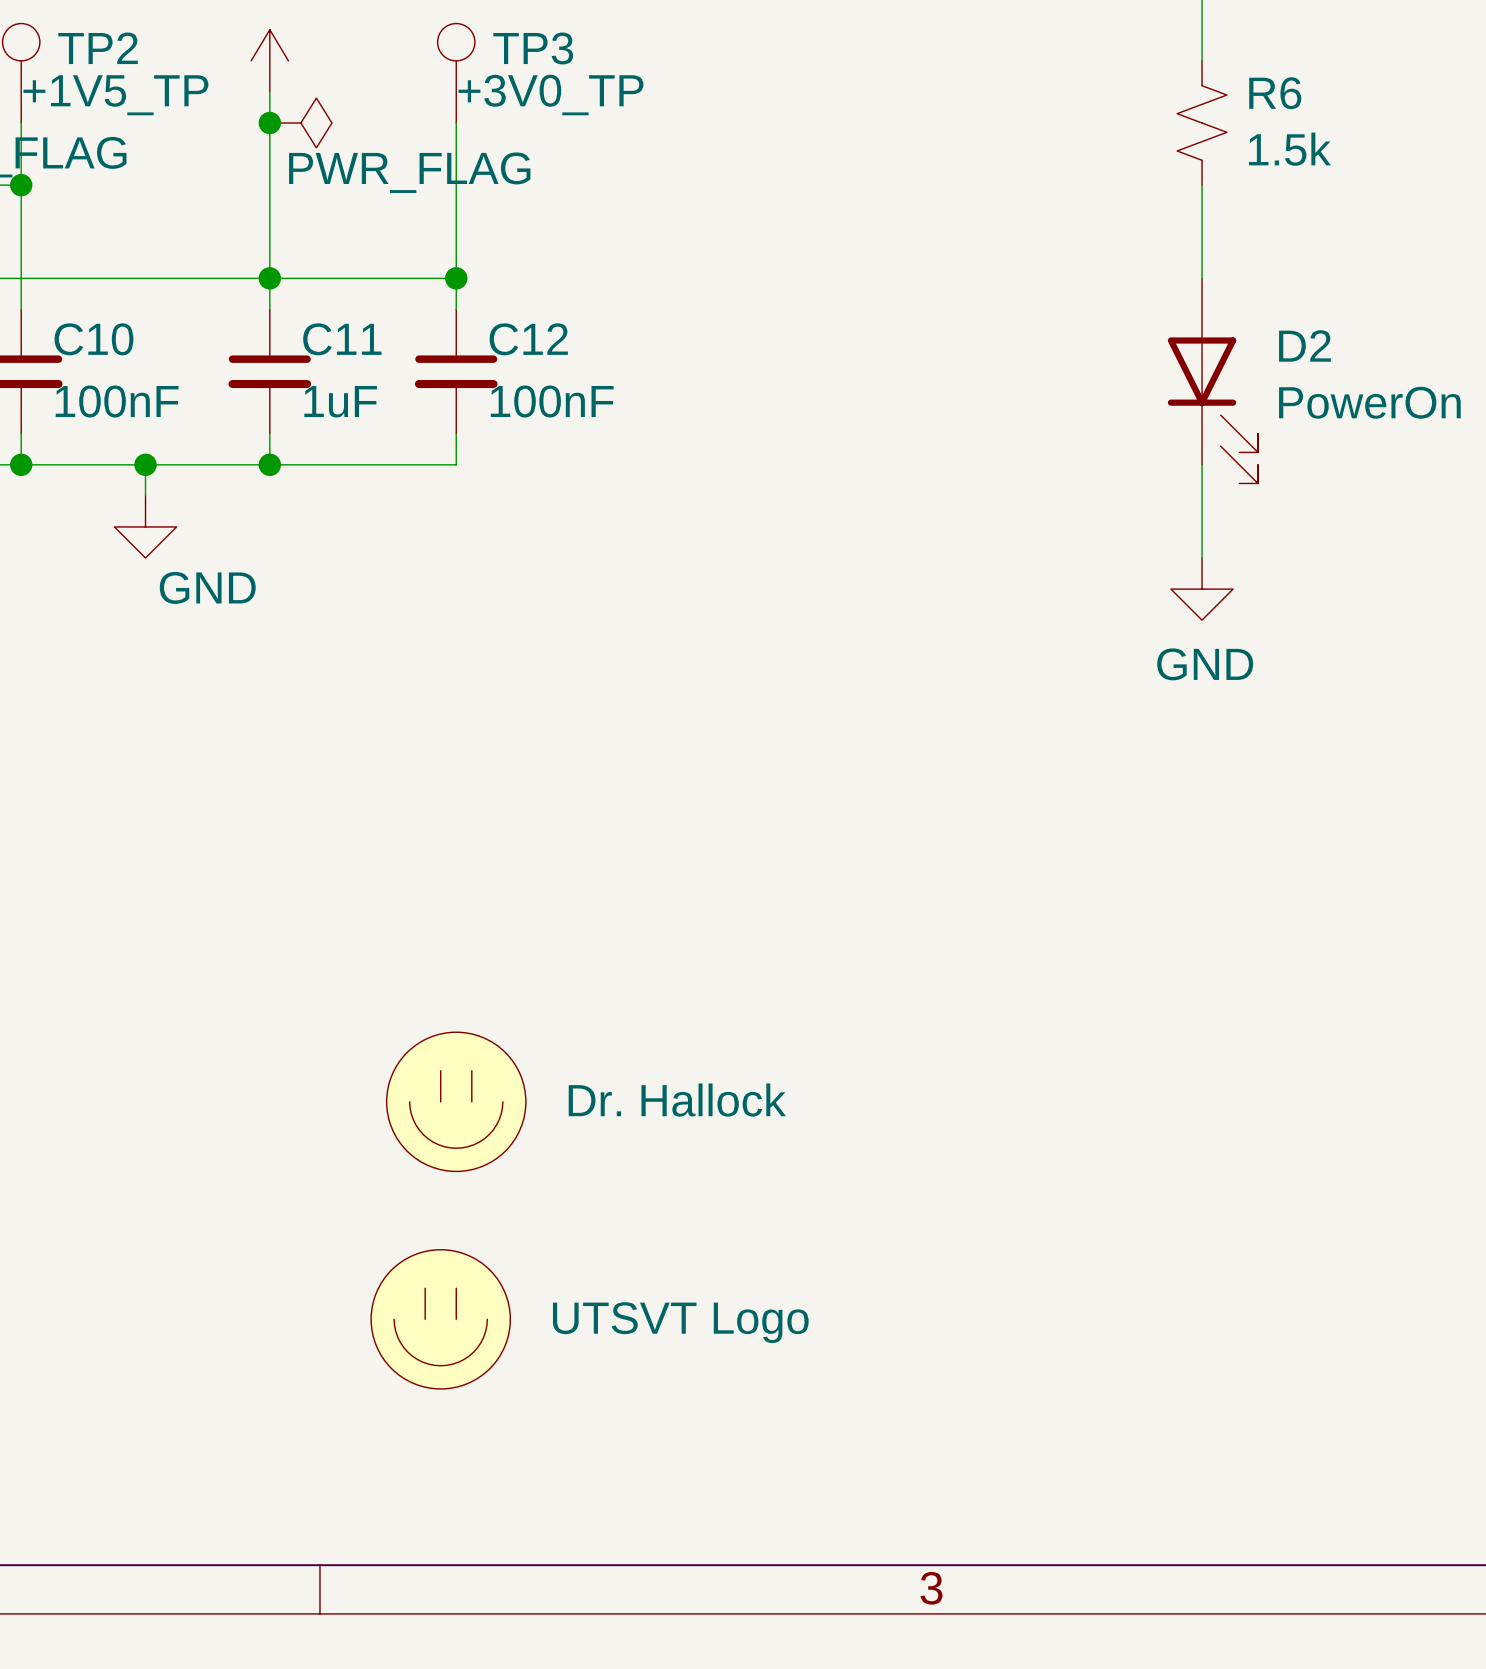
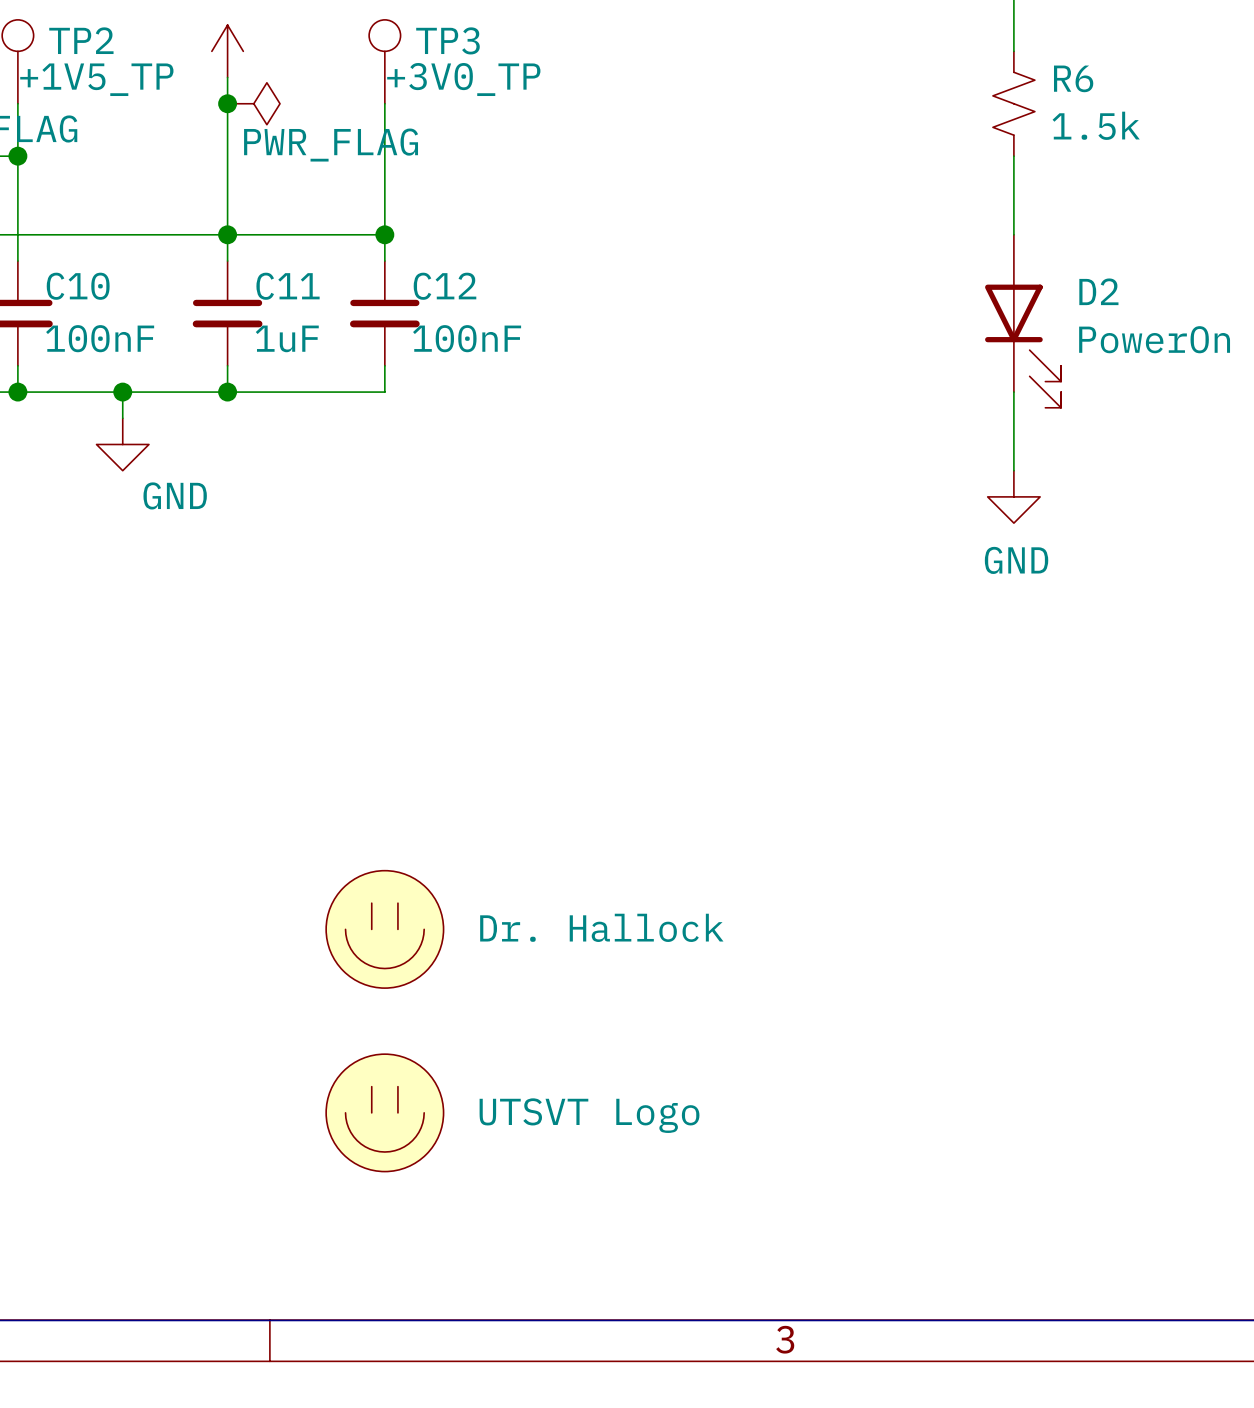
part position: (440, 1319) -> (384, 1112)

